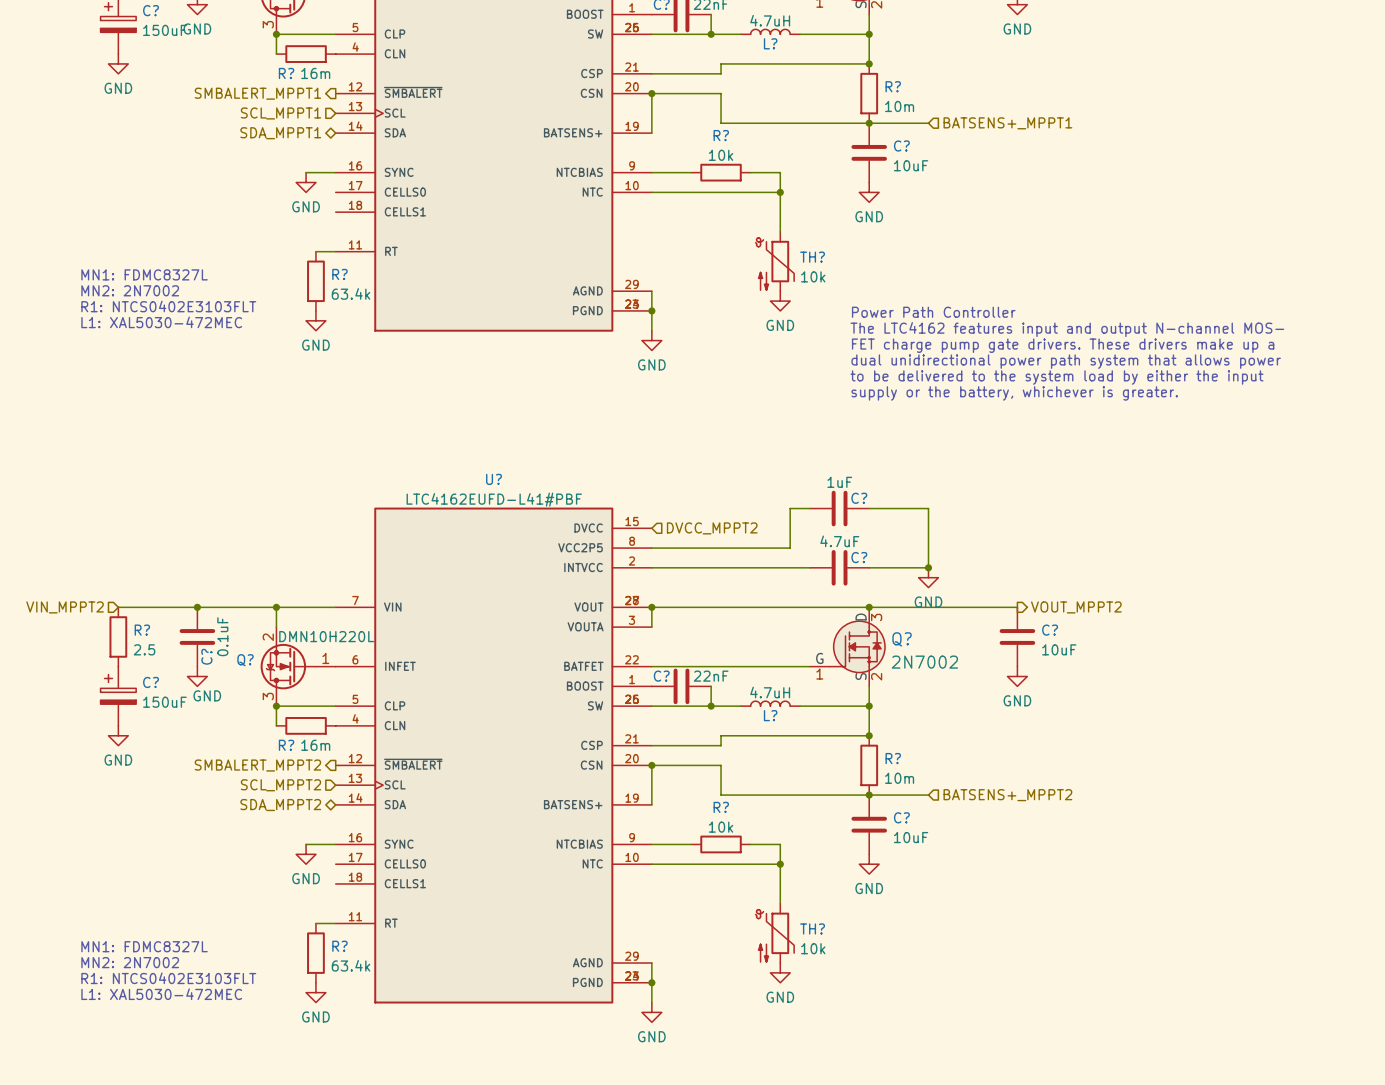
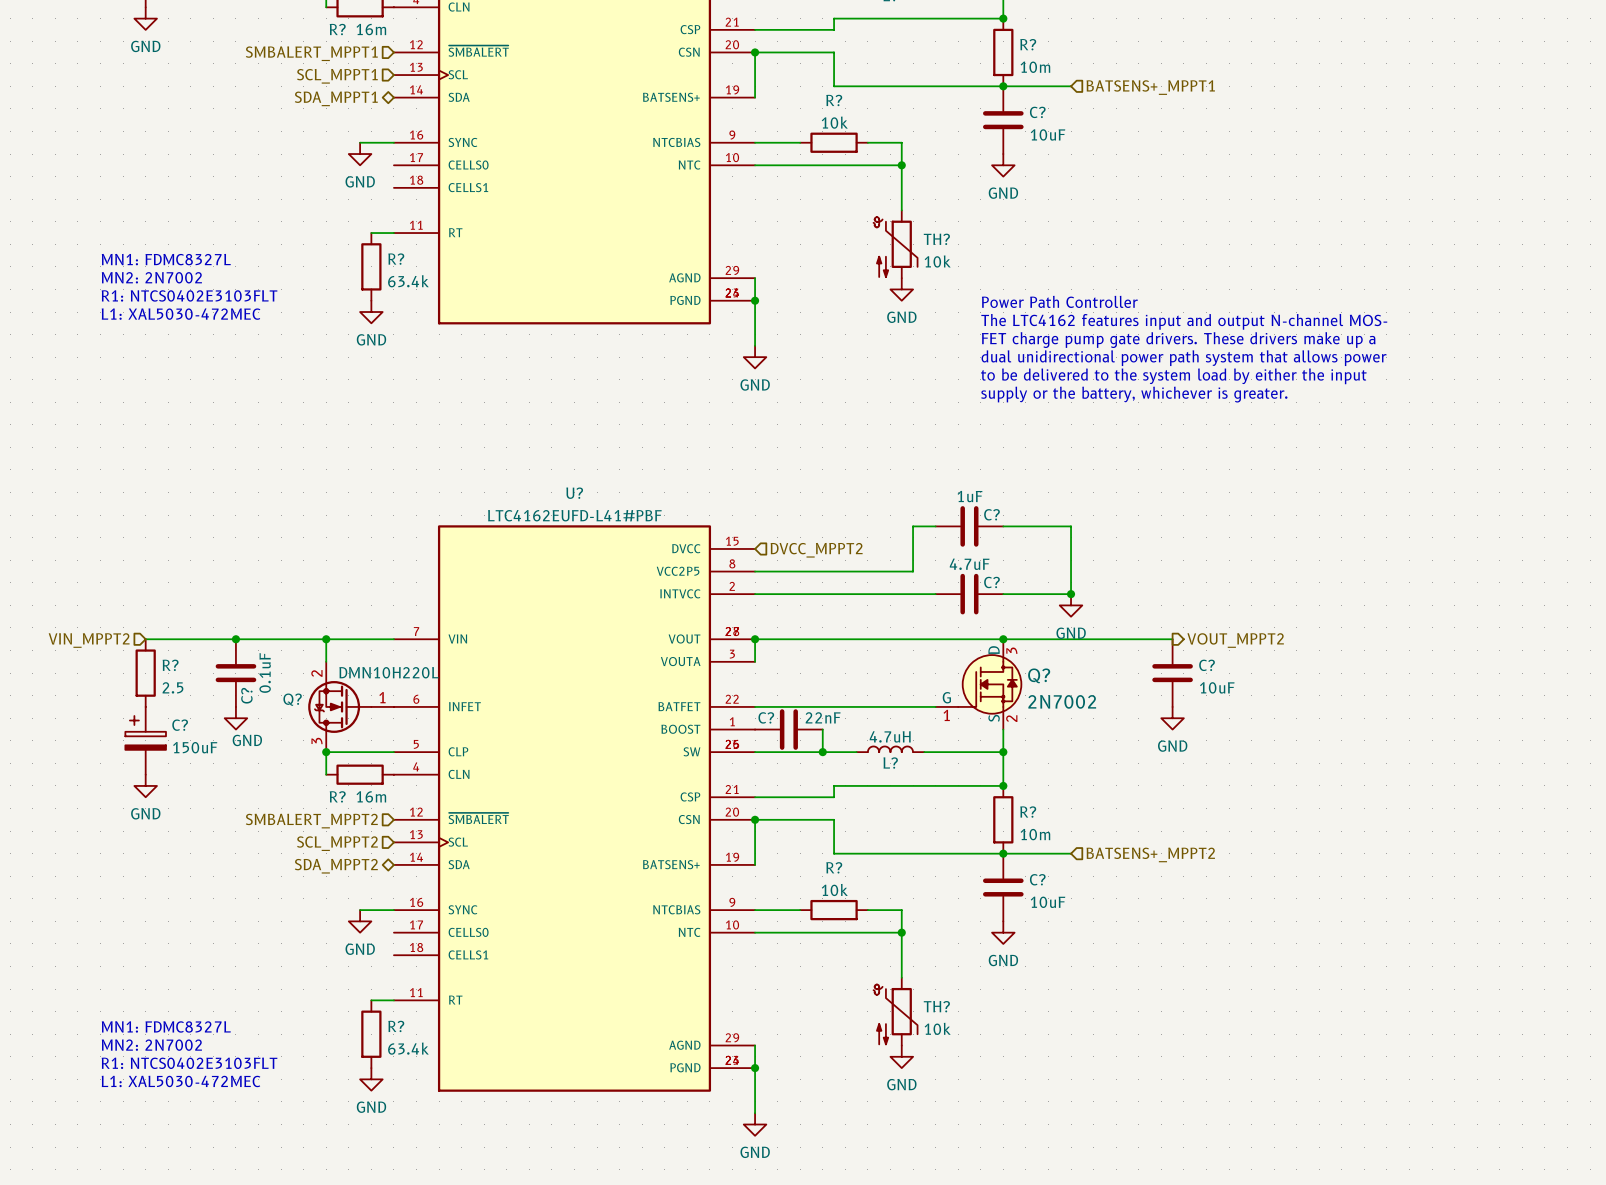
hierarchical label shape: output (257, 93) -> input (311, 53)
power symbol position: GND (651, 340) -> GND (755, 357)
hierarchical label shape: output (257, 765) -> input (311, 821)
power symbol position: GND (651, 1012) -> GND (755, 1124)

